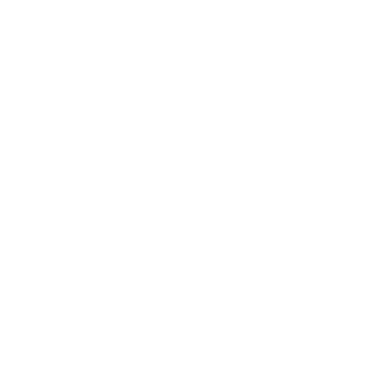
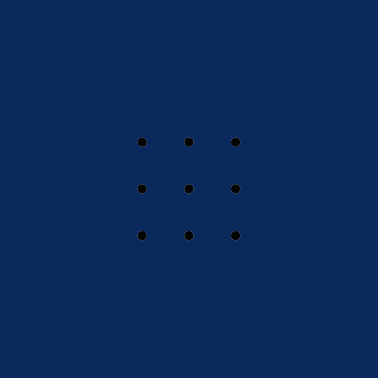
part: none -> (188, 188)

